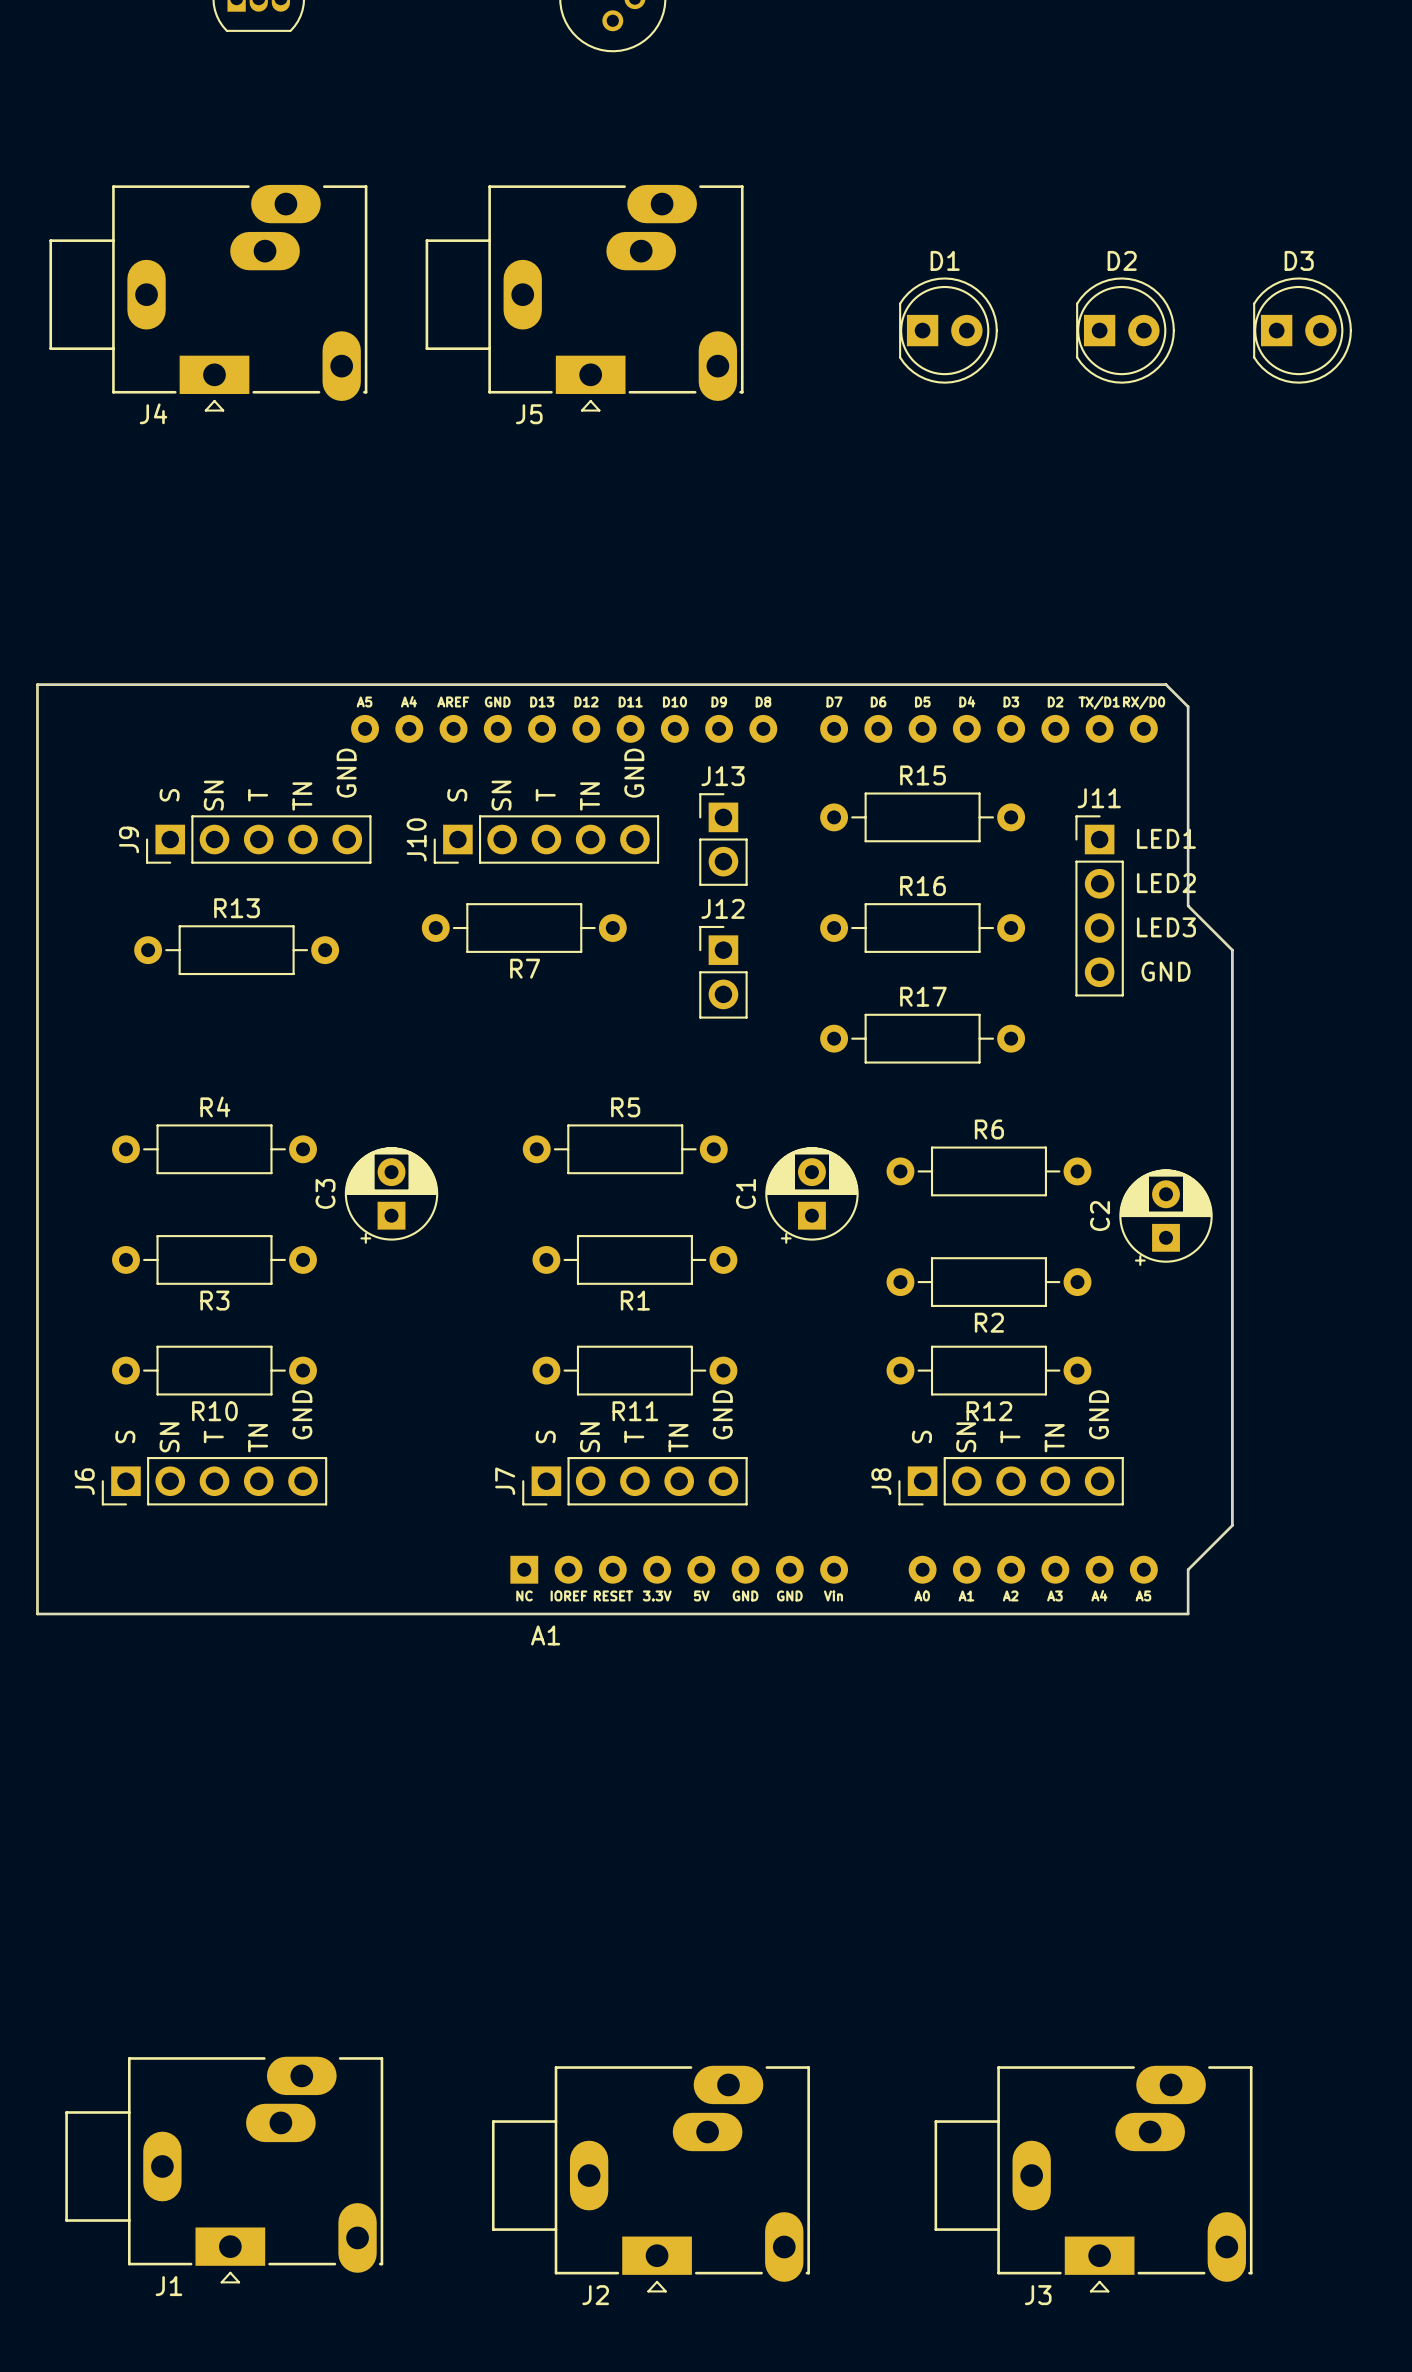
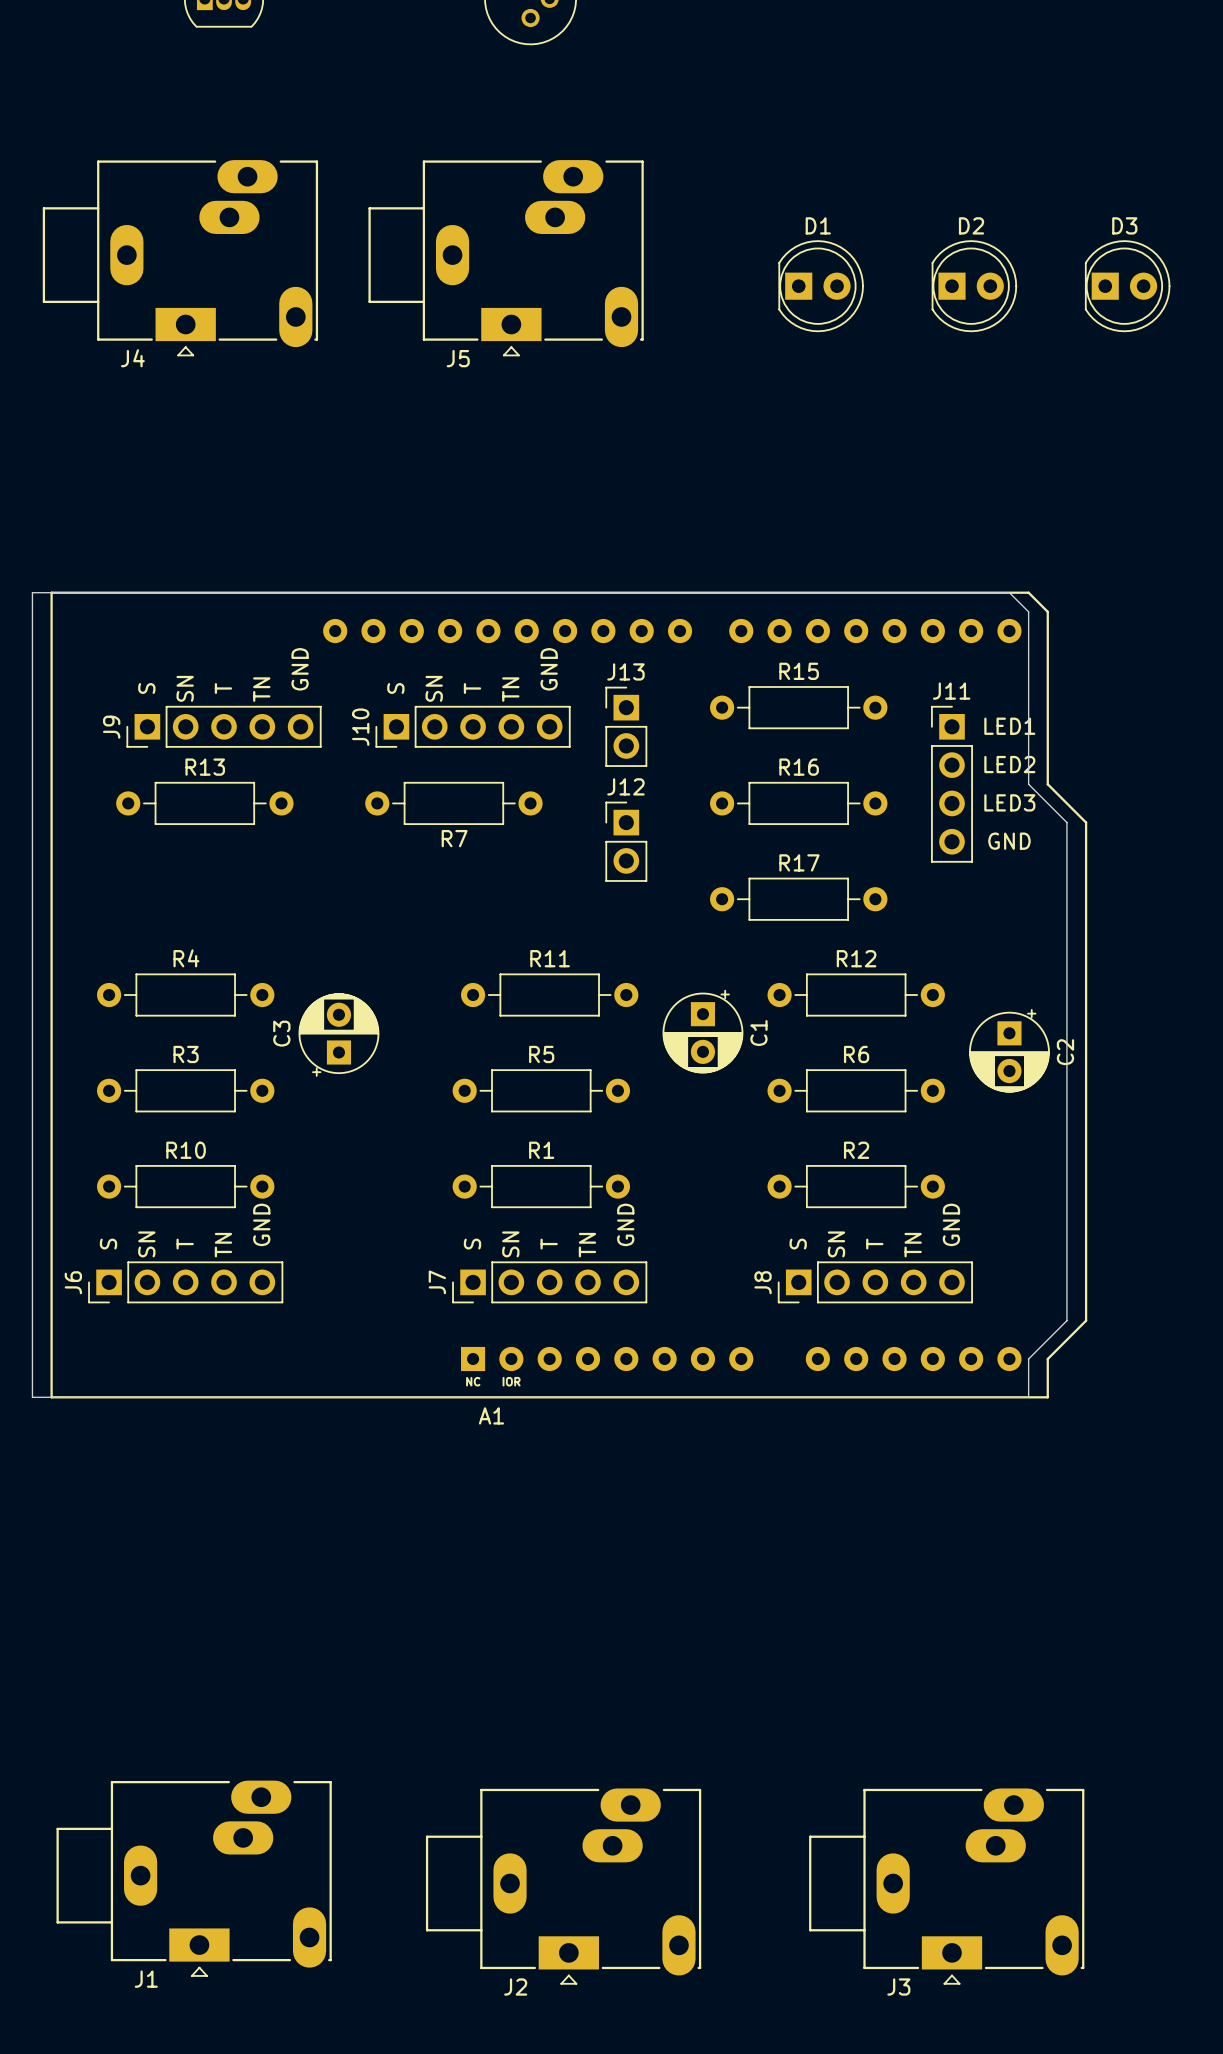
A1 footprint: [36, 683, 1234, 1616] -> [50, 591, 1088, 1399]
R13 position: (236, 950) -> (204, 803)
R5 position: (625, 1149) -> (541, 1090)
R12: none -> (856, 995)
R6 position: (988, 1171) -> (856, 1090)
C1 rotation: 0° (811, 1195) -> 180° (702, 1031)
C2 rotation: 0° (1166, 1217) -> 180° (1009, 1050)
R1 position: (634, 1259) -> (541, 1186)
R2: (988, 1282) -> none
R3 name position: R3 (214, 1300) -> R3 (186, 1054)
R1 name position: R1 (635, 1300) -> R1 (541, 1150)
R11 position: (634, 1370) -> (549, 995)
R10 name position: R10 (214, 1411) -> R10 (186, 1150)
R11 name position: R11 (635, 1411) -> R11 (550, 958)
R12 name: R12 (989, 1411) -> R2 (856, 1150)

